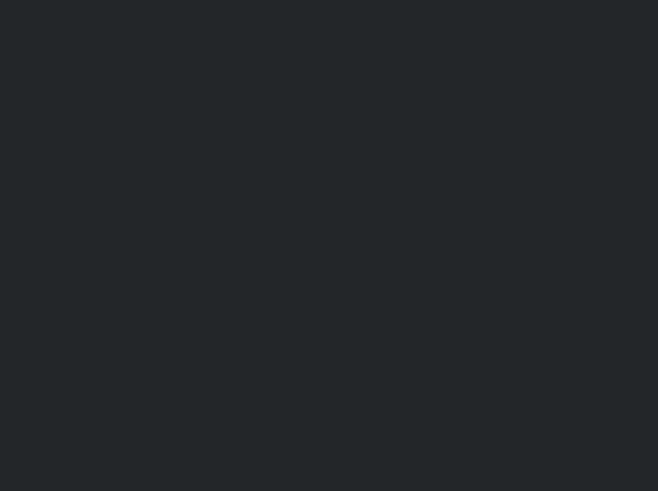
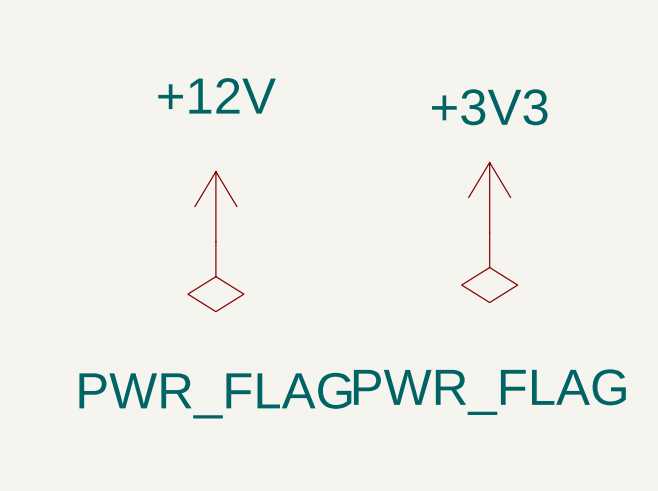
power symbol: none -> +3V3 (489, 197)
power symbol: none -> +12V (215, 206)
power symbol: none -> PWR_FLAG (489, 267)
power symbol: none -> PWR_FLAG (215, 276)

